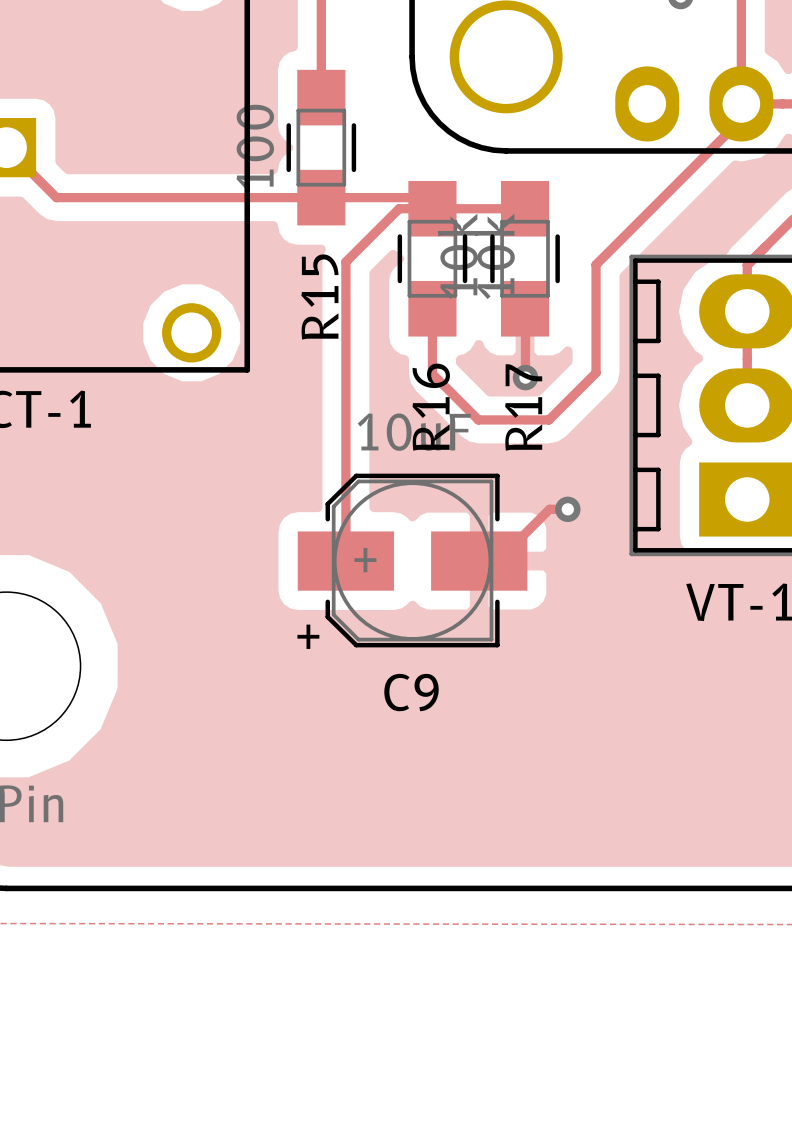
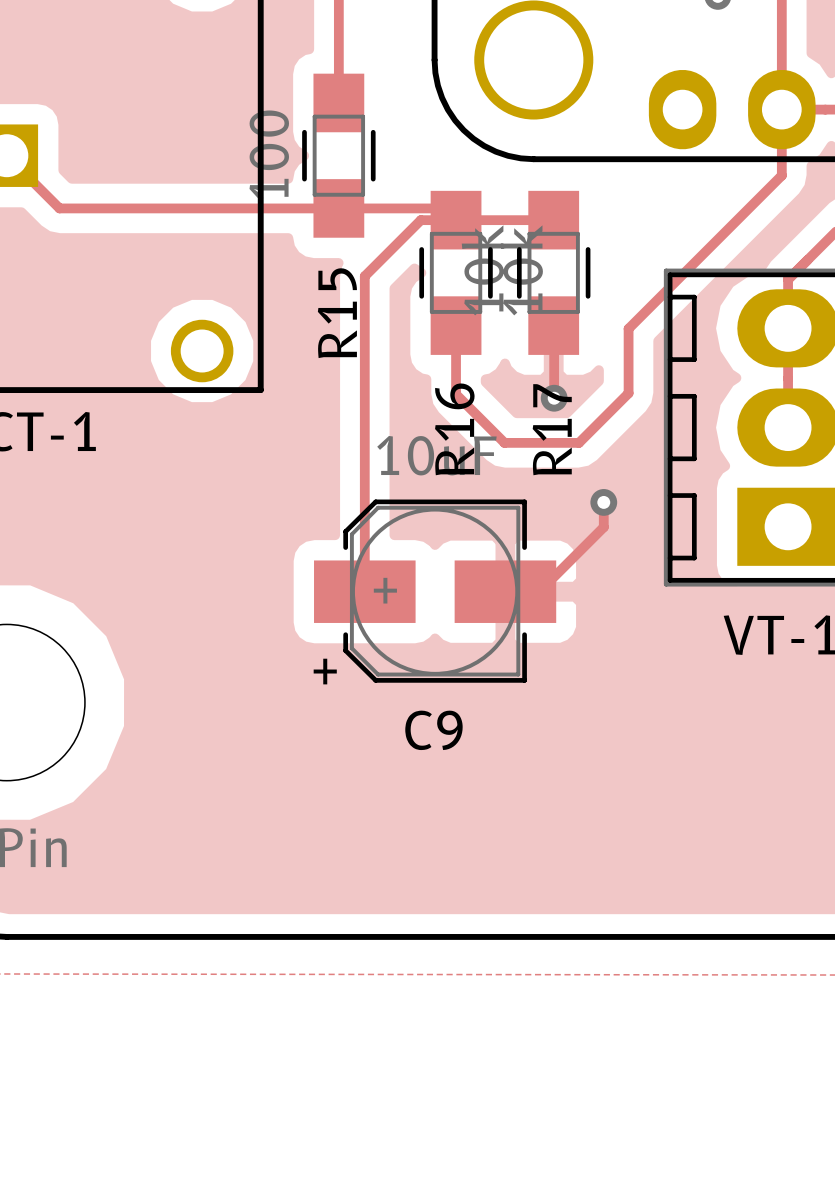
track: (741, 119) (596, 264) (596, 311) -> (781, 125) (781, 175) (628, 328)
track: (567, 509) (549, 509) (497, 561) -> (603, 502) (603, 527) (539, 591) (524, 591)
via position: (567, 509) -> (603, 502)

